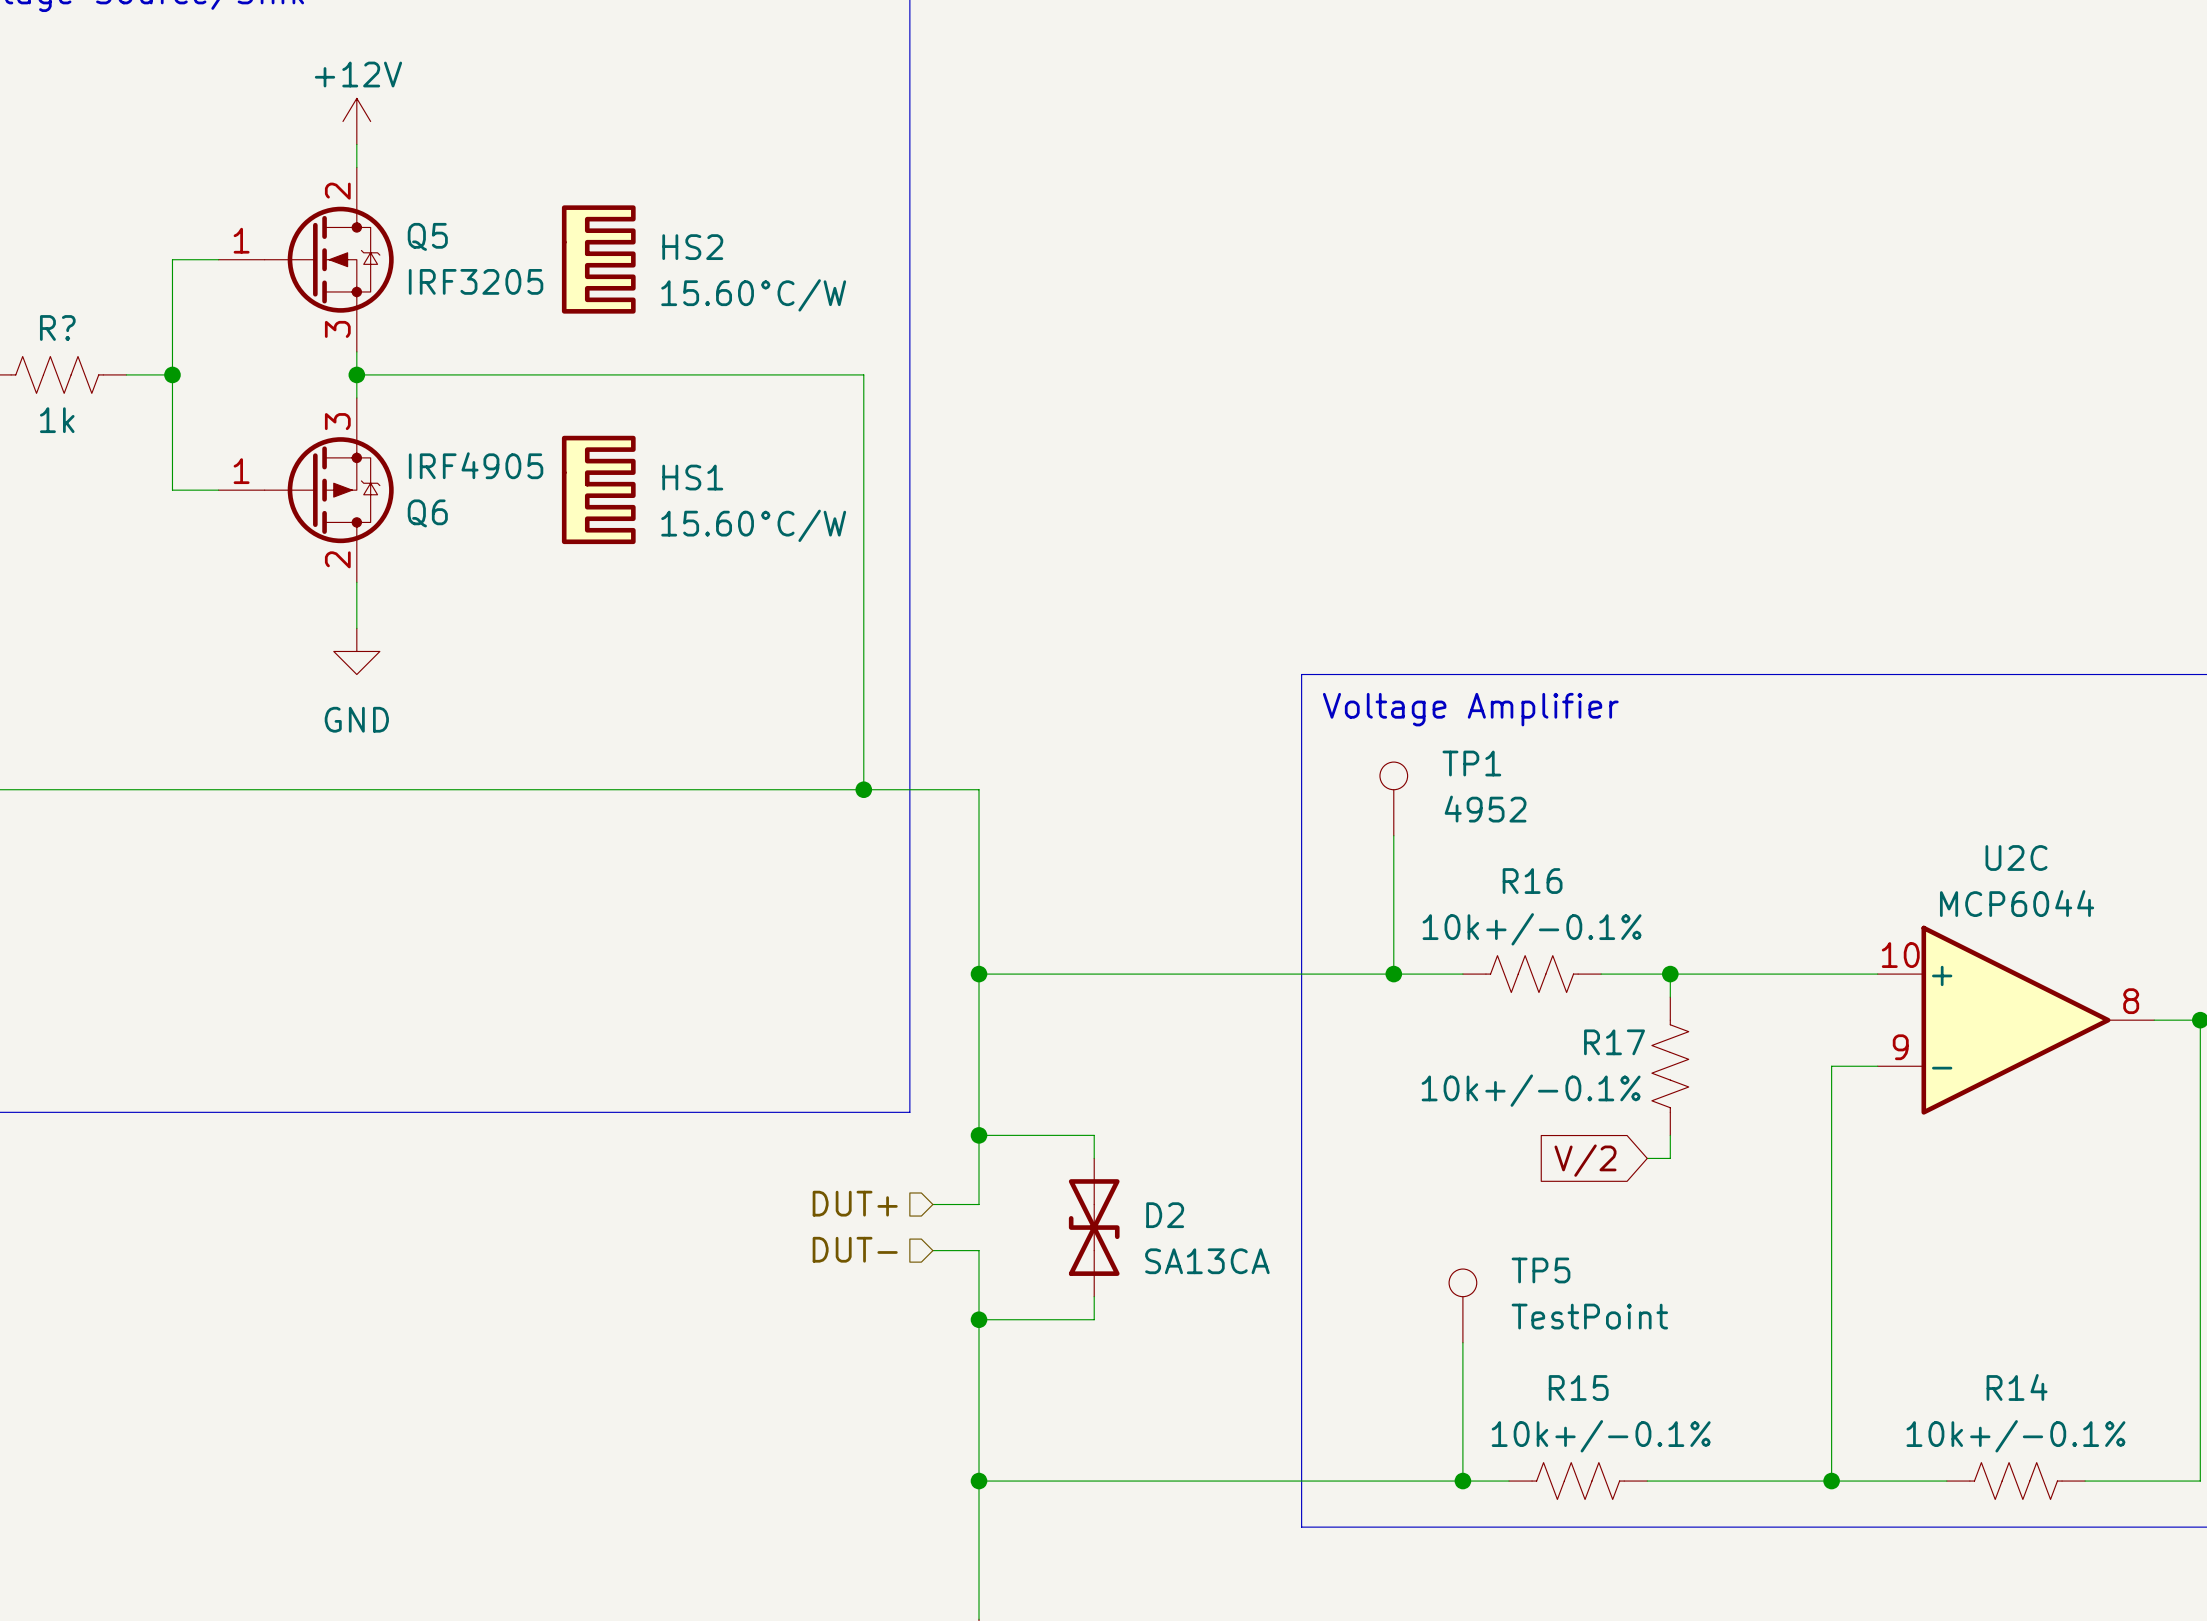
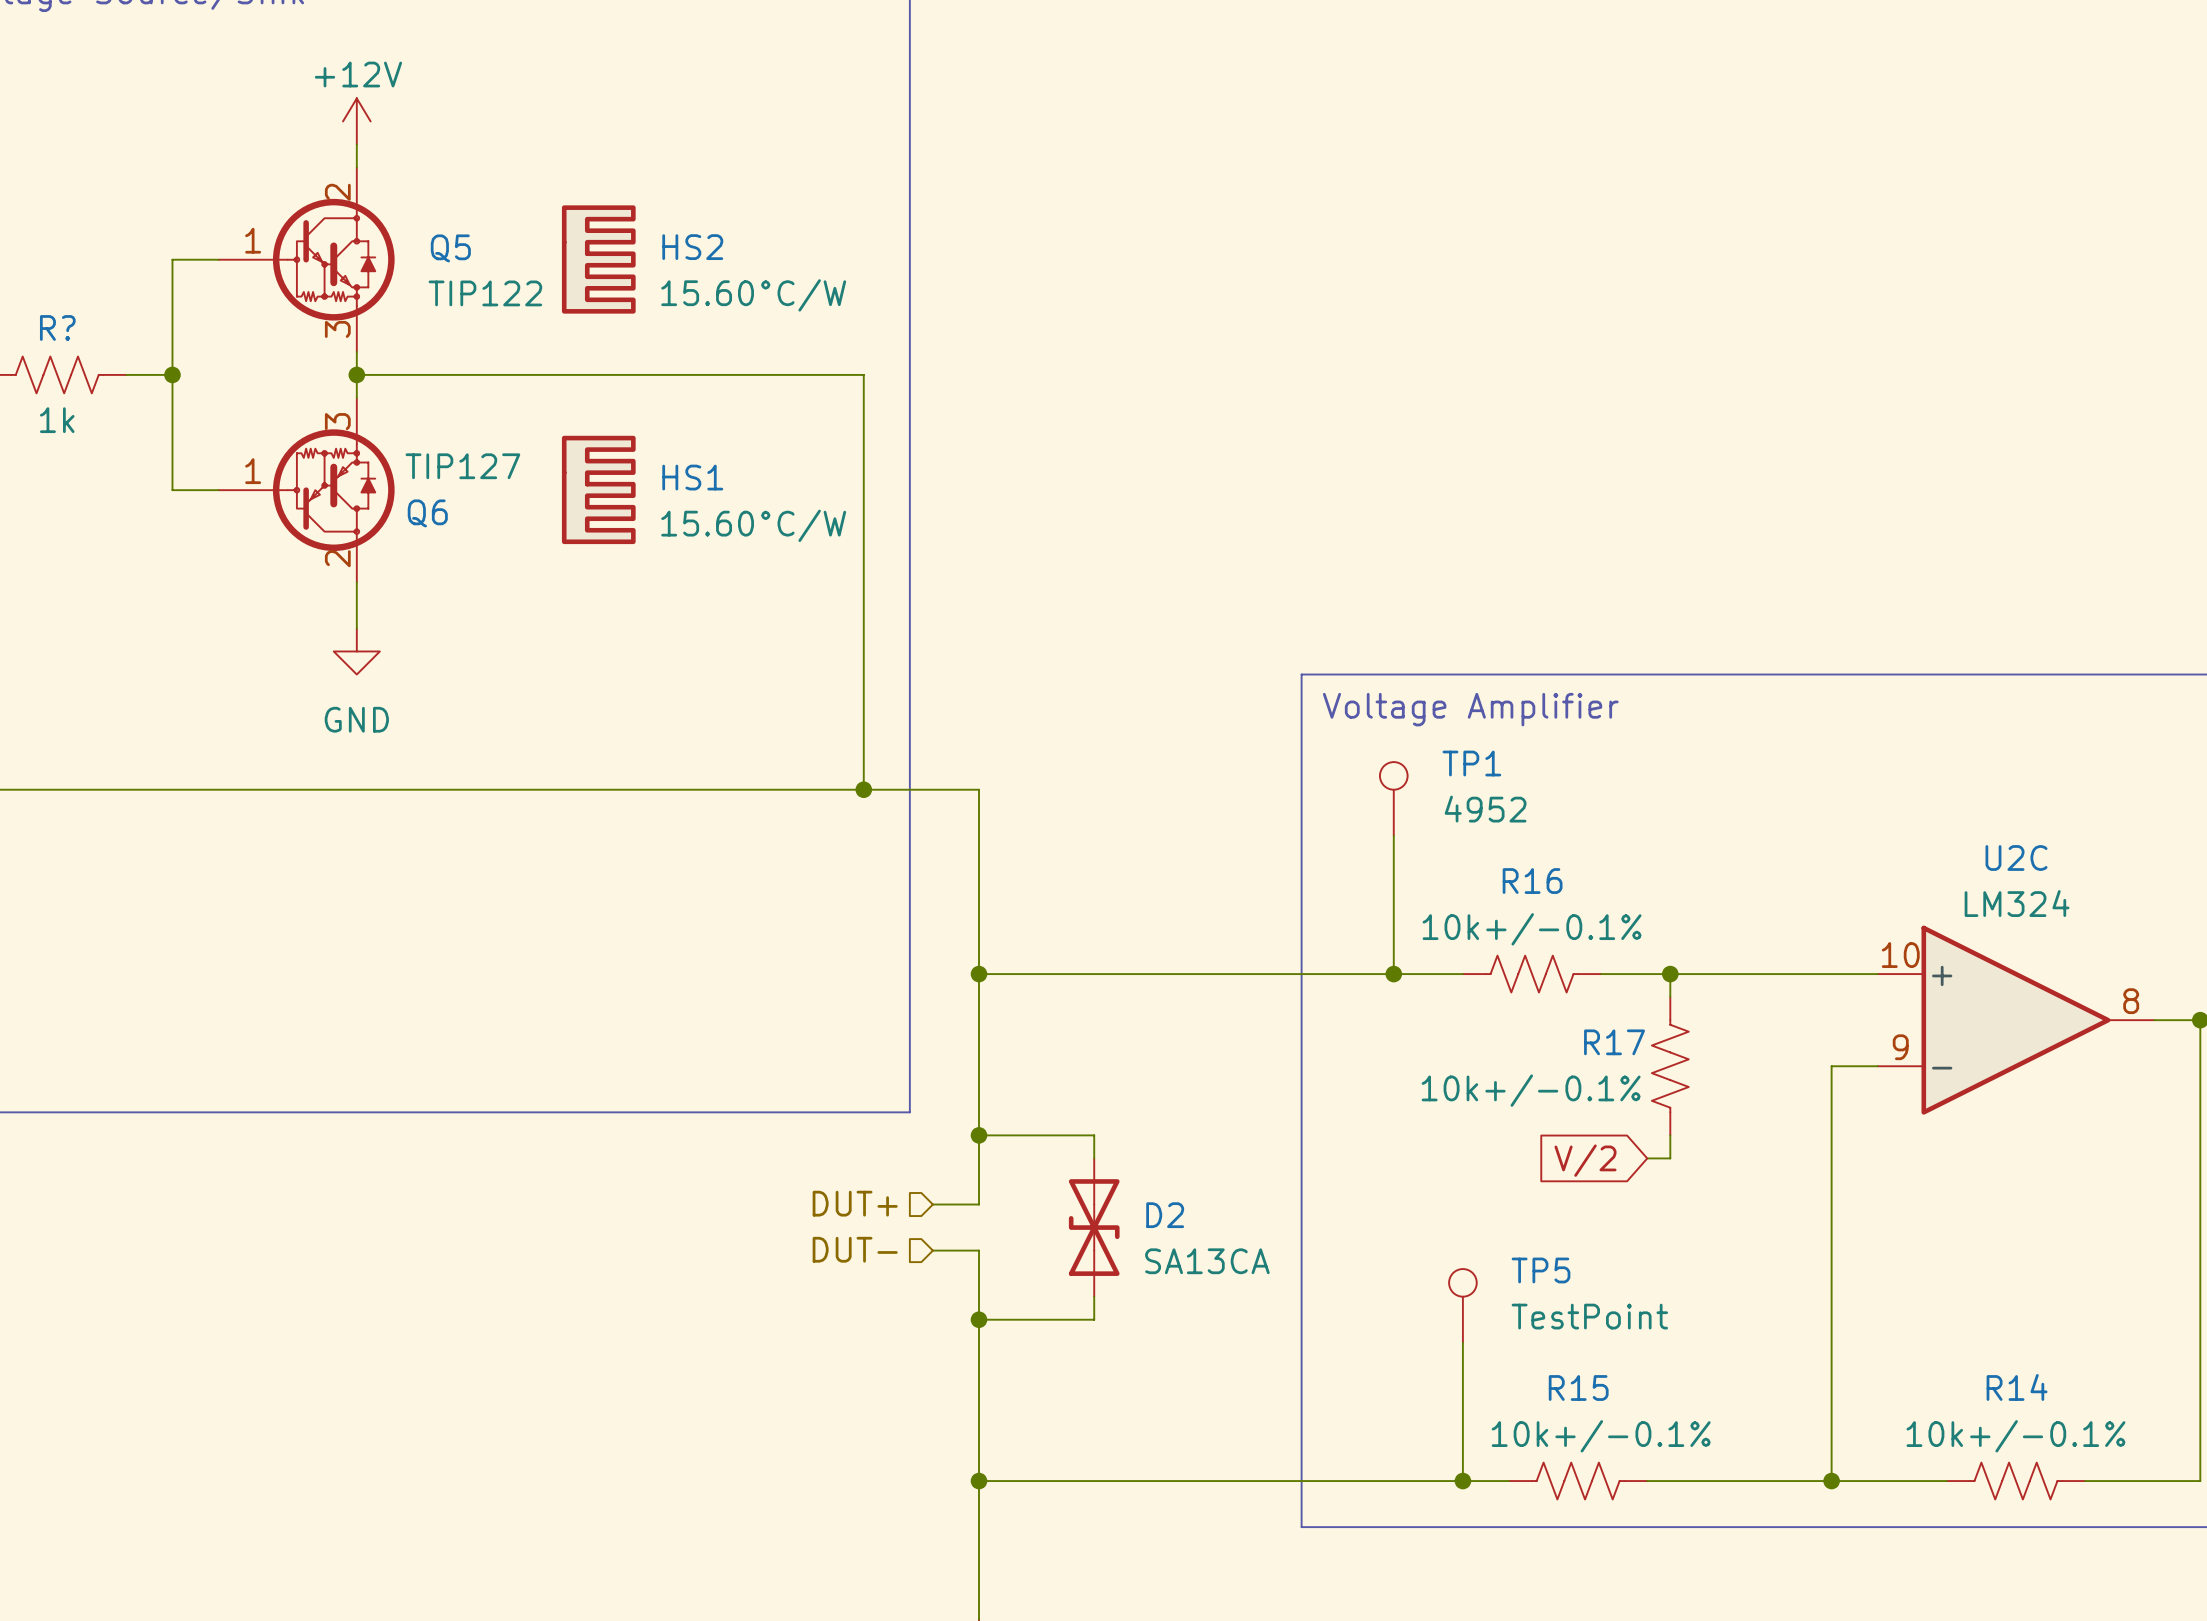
Q5 symbol: [218, 167, 394, 352] -> [218, 167, 395, 352]
Q5 value: IRF3205 (476, 281) -> TIP122 (485, 293)
Q6 symbol: [218, 397, 394, 583] -> [218, 397, 395, 583]
Q6 value: IRF4905 (476, 465) -> TIP127 (462, 466)
U2C value: MCP6044 (2017, 903) -> LM324 (2017, 903)

